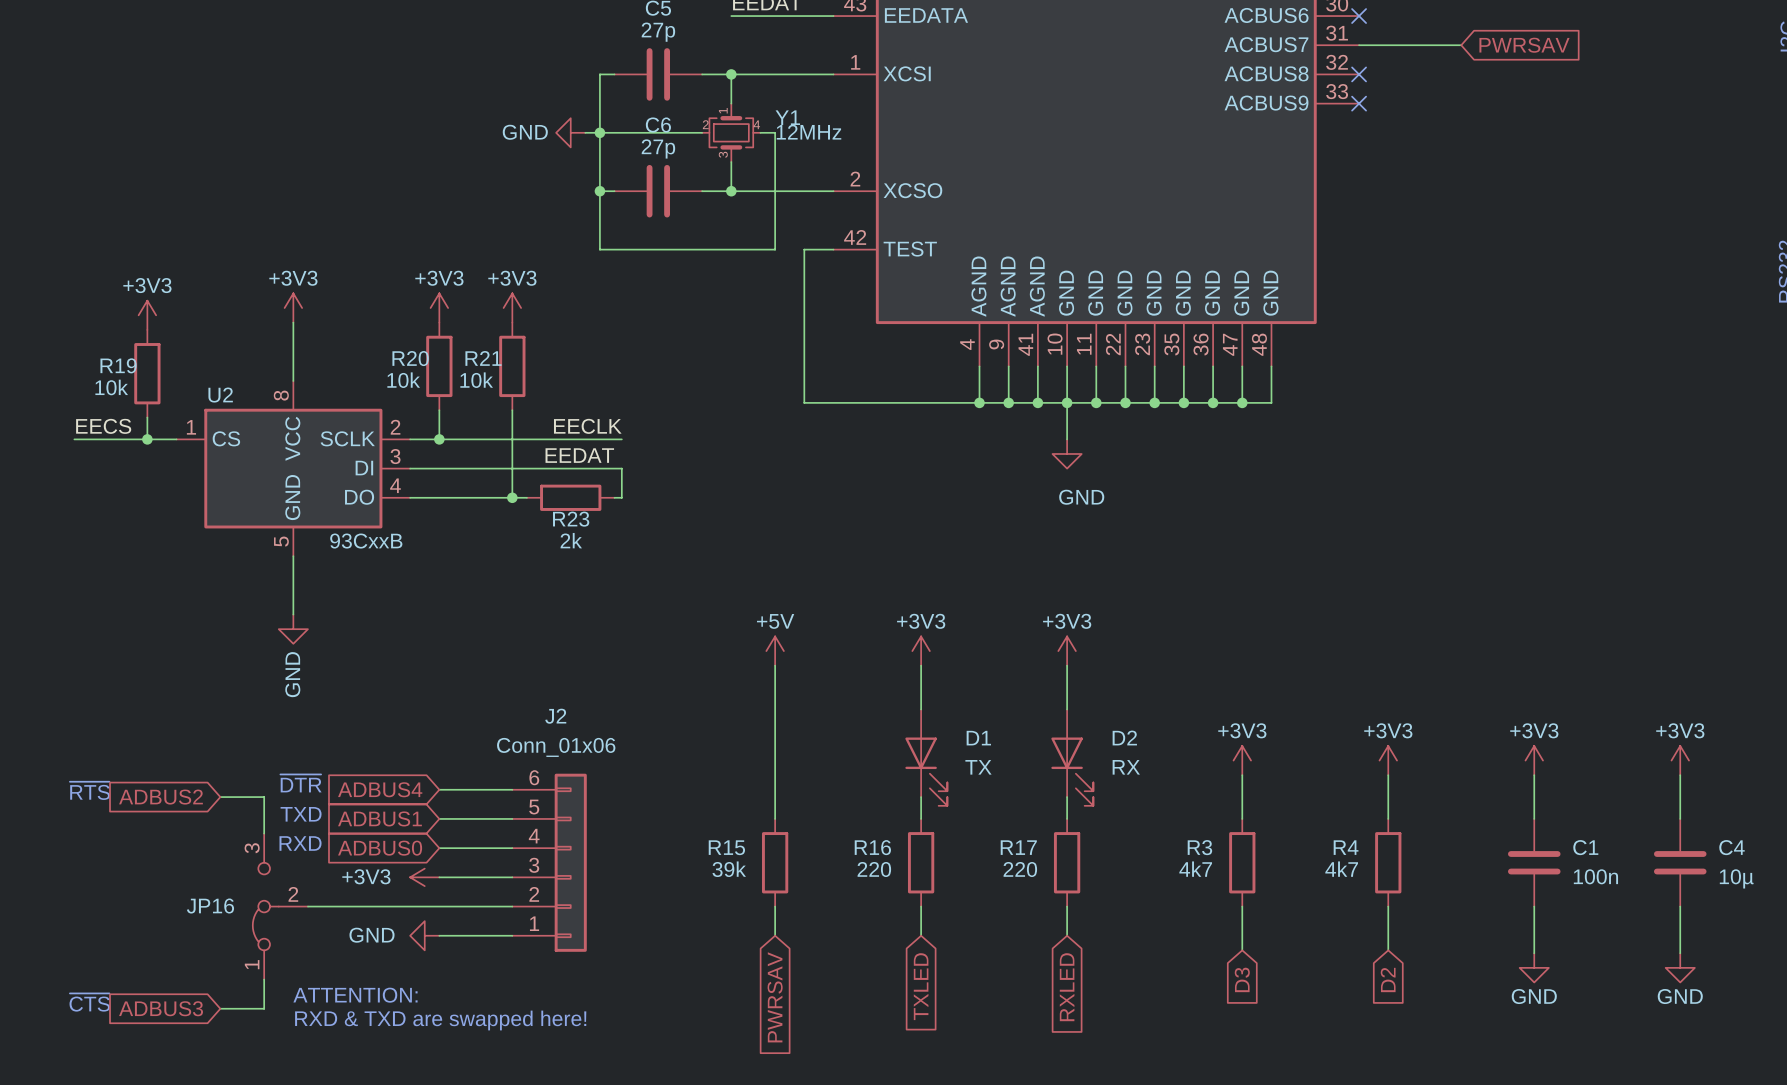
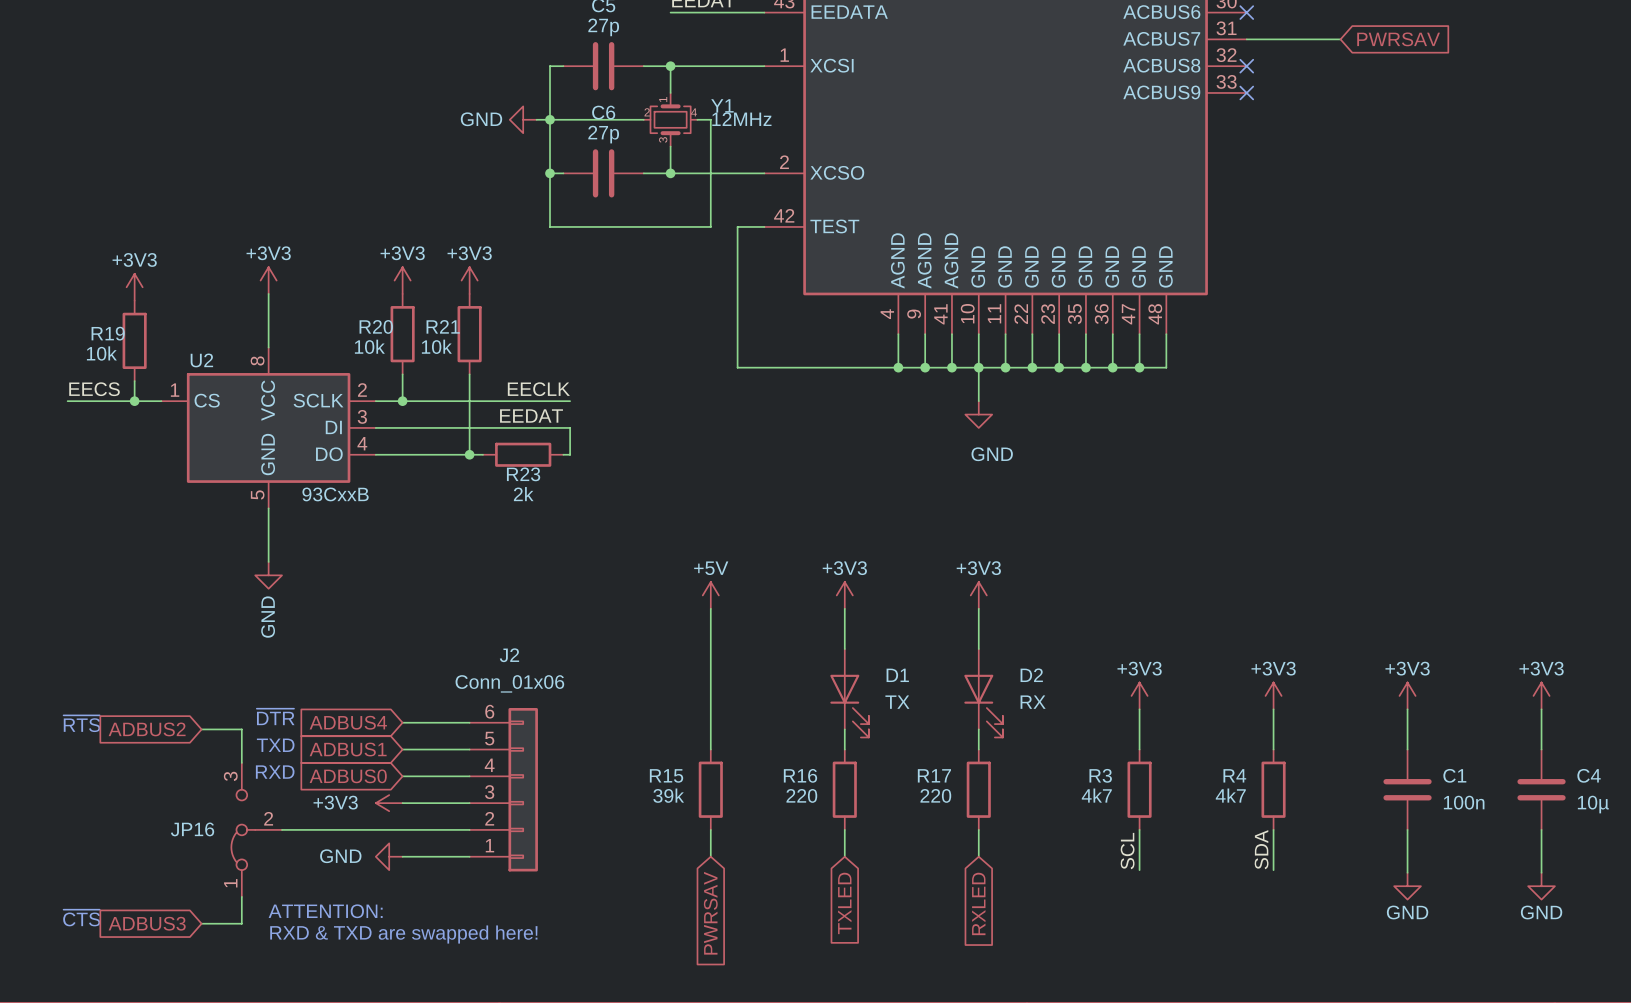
label: none -> SDA (1261, 849)
label: none -> SCL (1127, 851)
global label: D3 (1242, 979) -> none
global label: D2 (1388, 980) -> none

